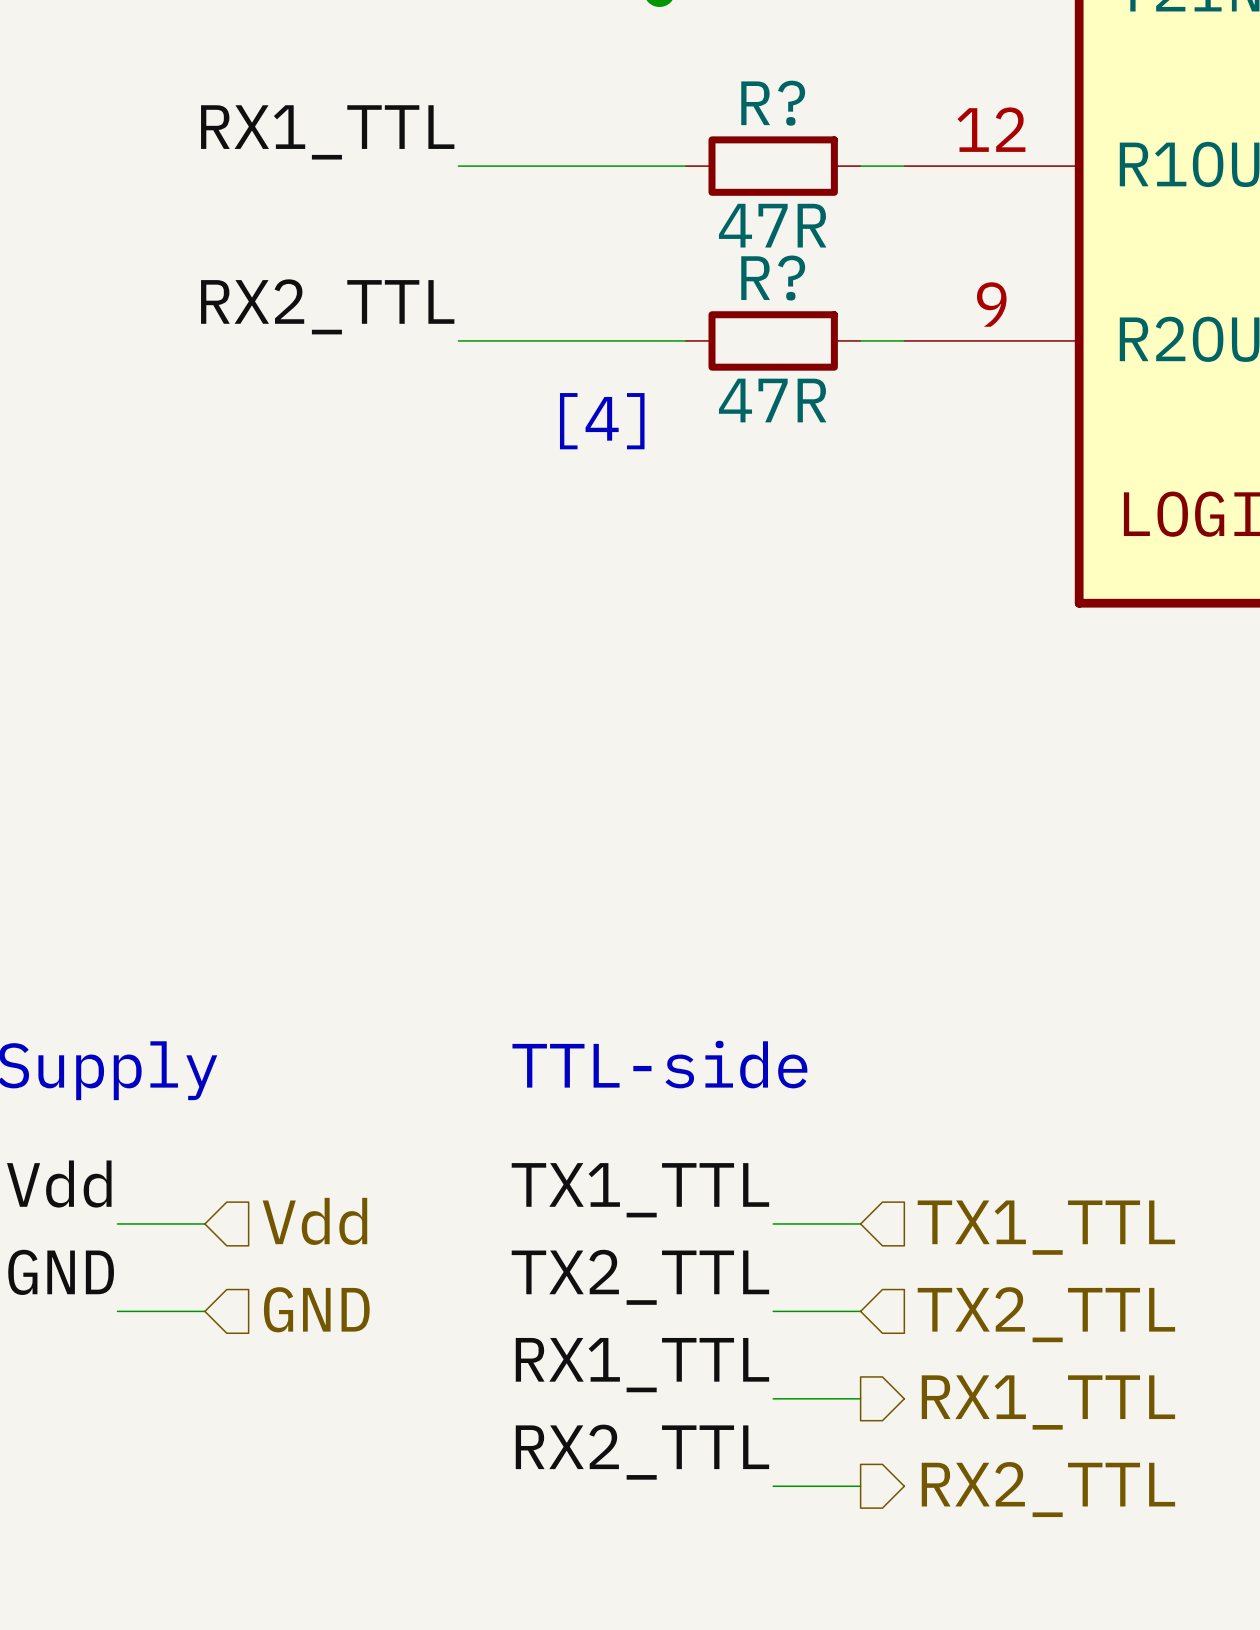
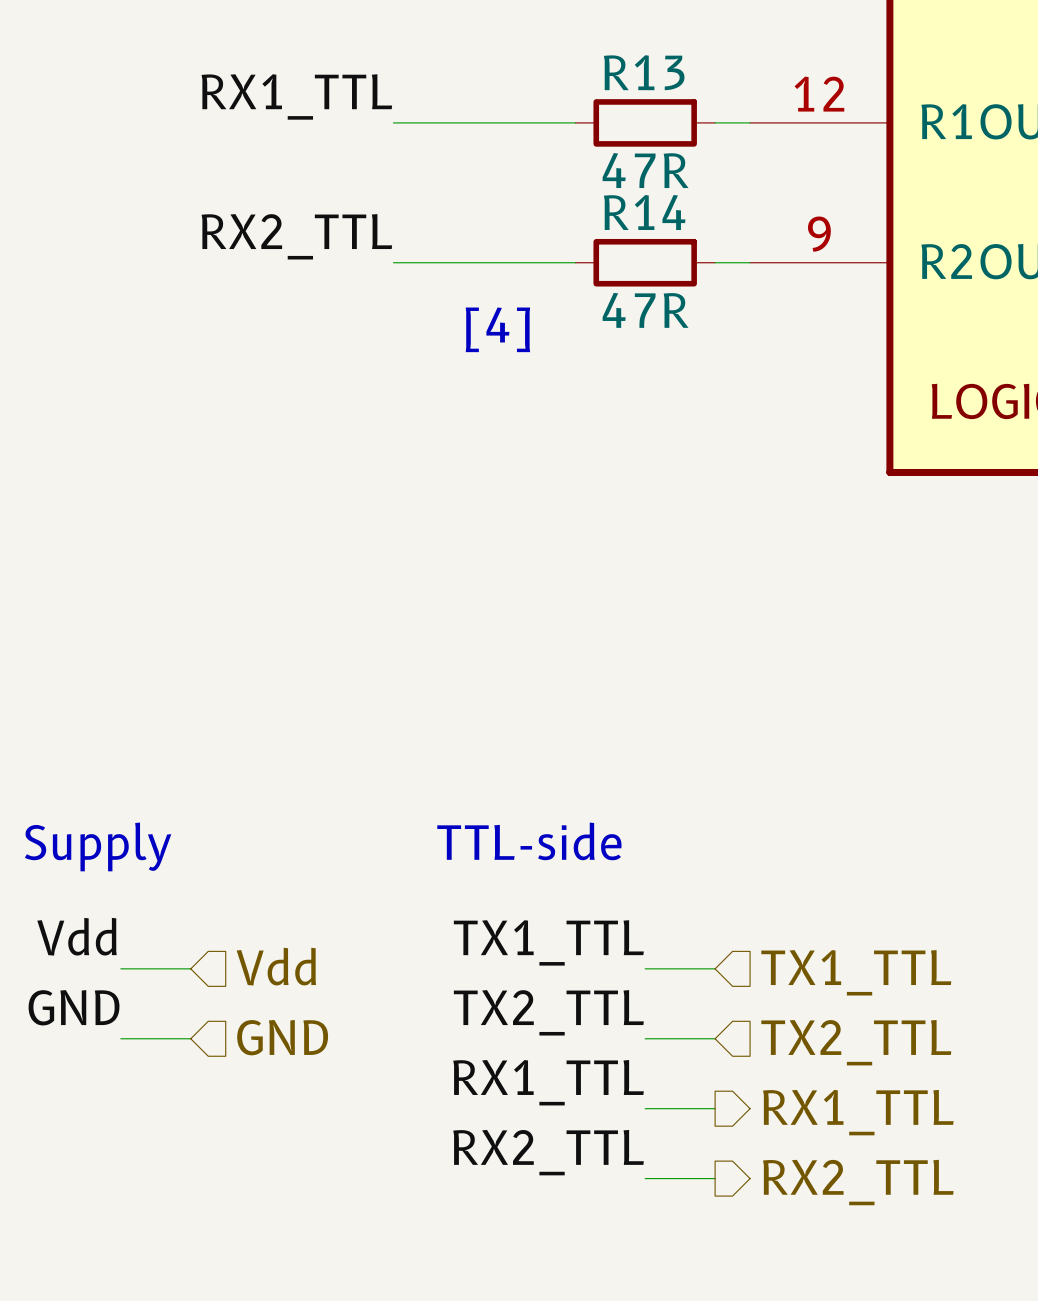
R? name: R? (773, 103) -> R13 (644, 72)
R? name: R? (773, 278) -> R14 (644, 212)

